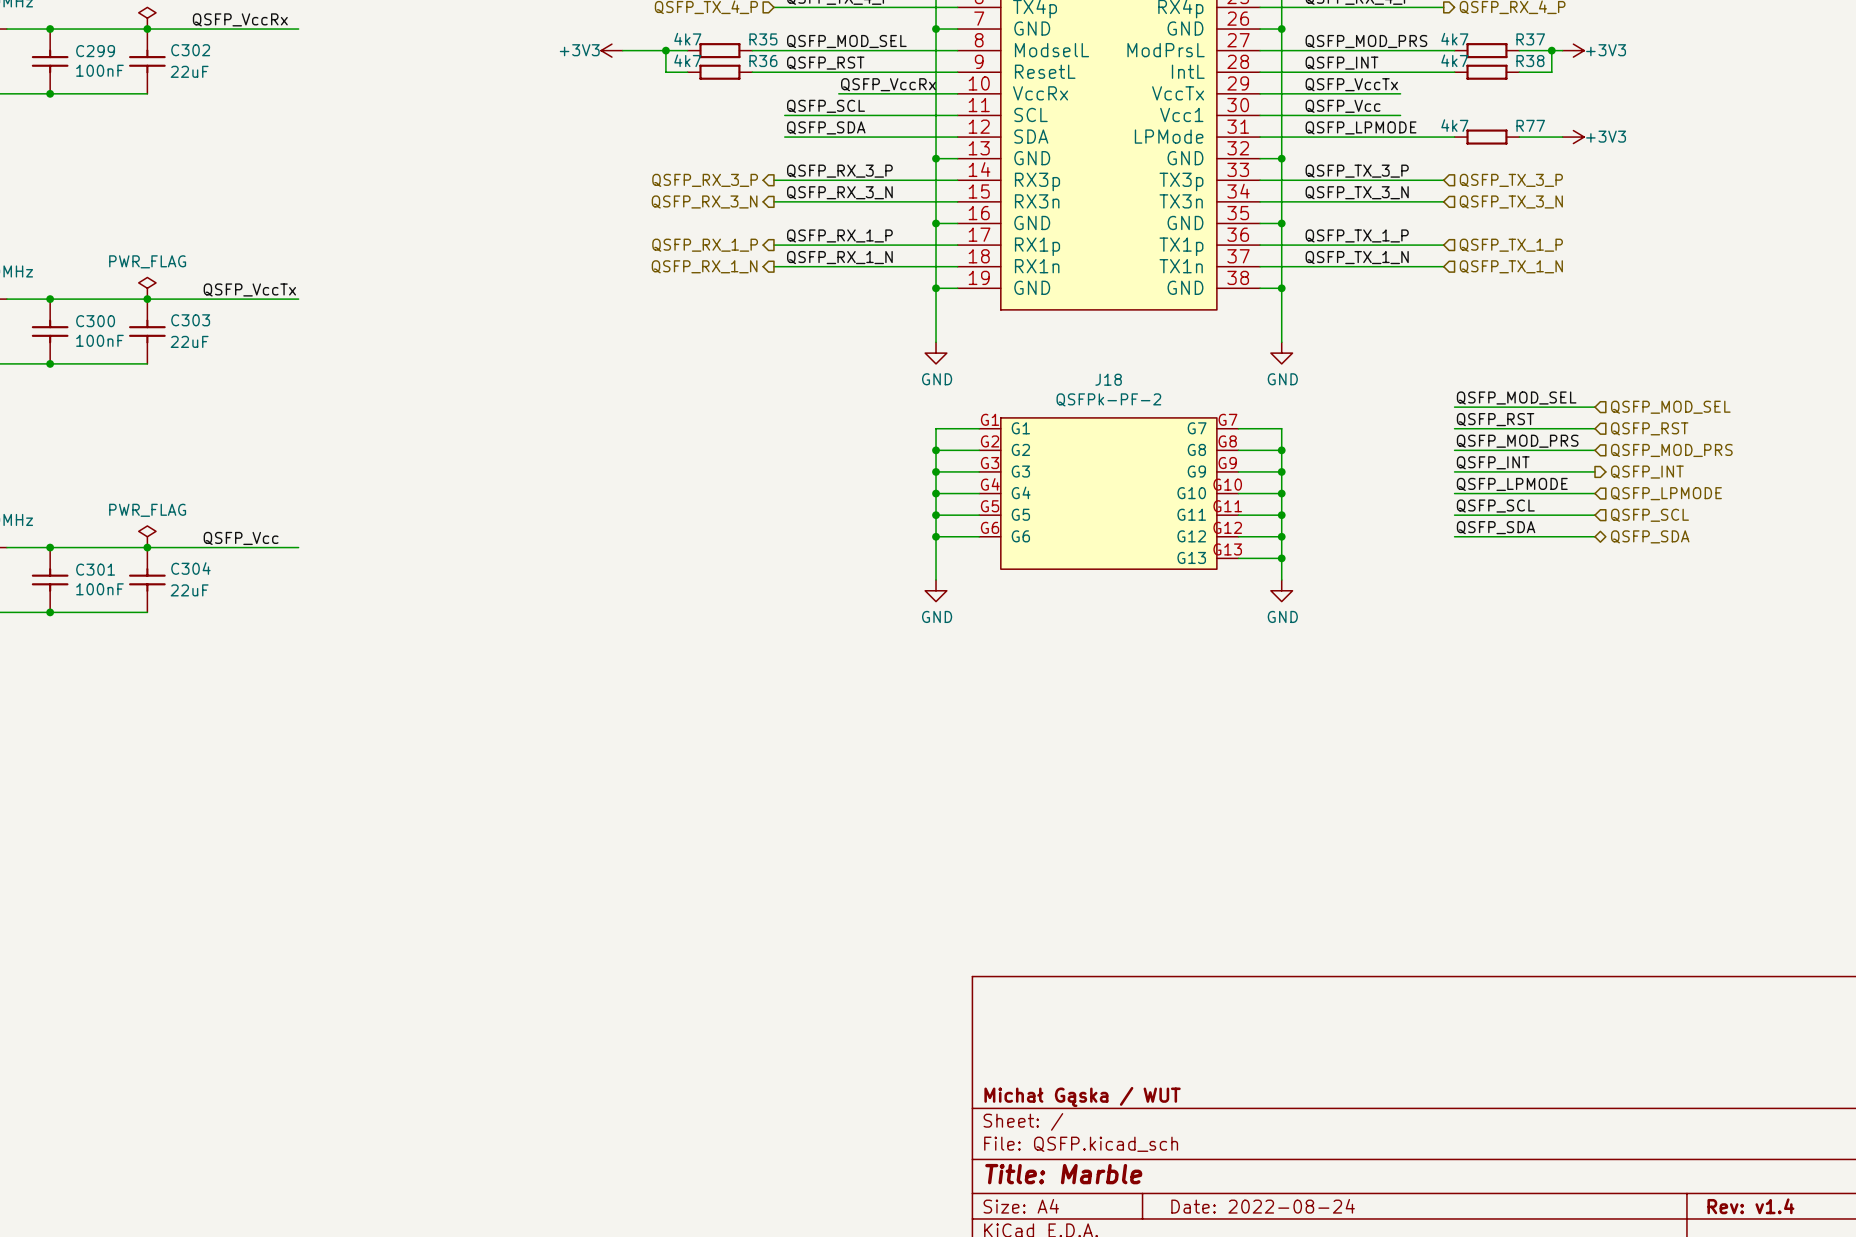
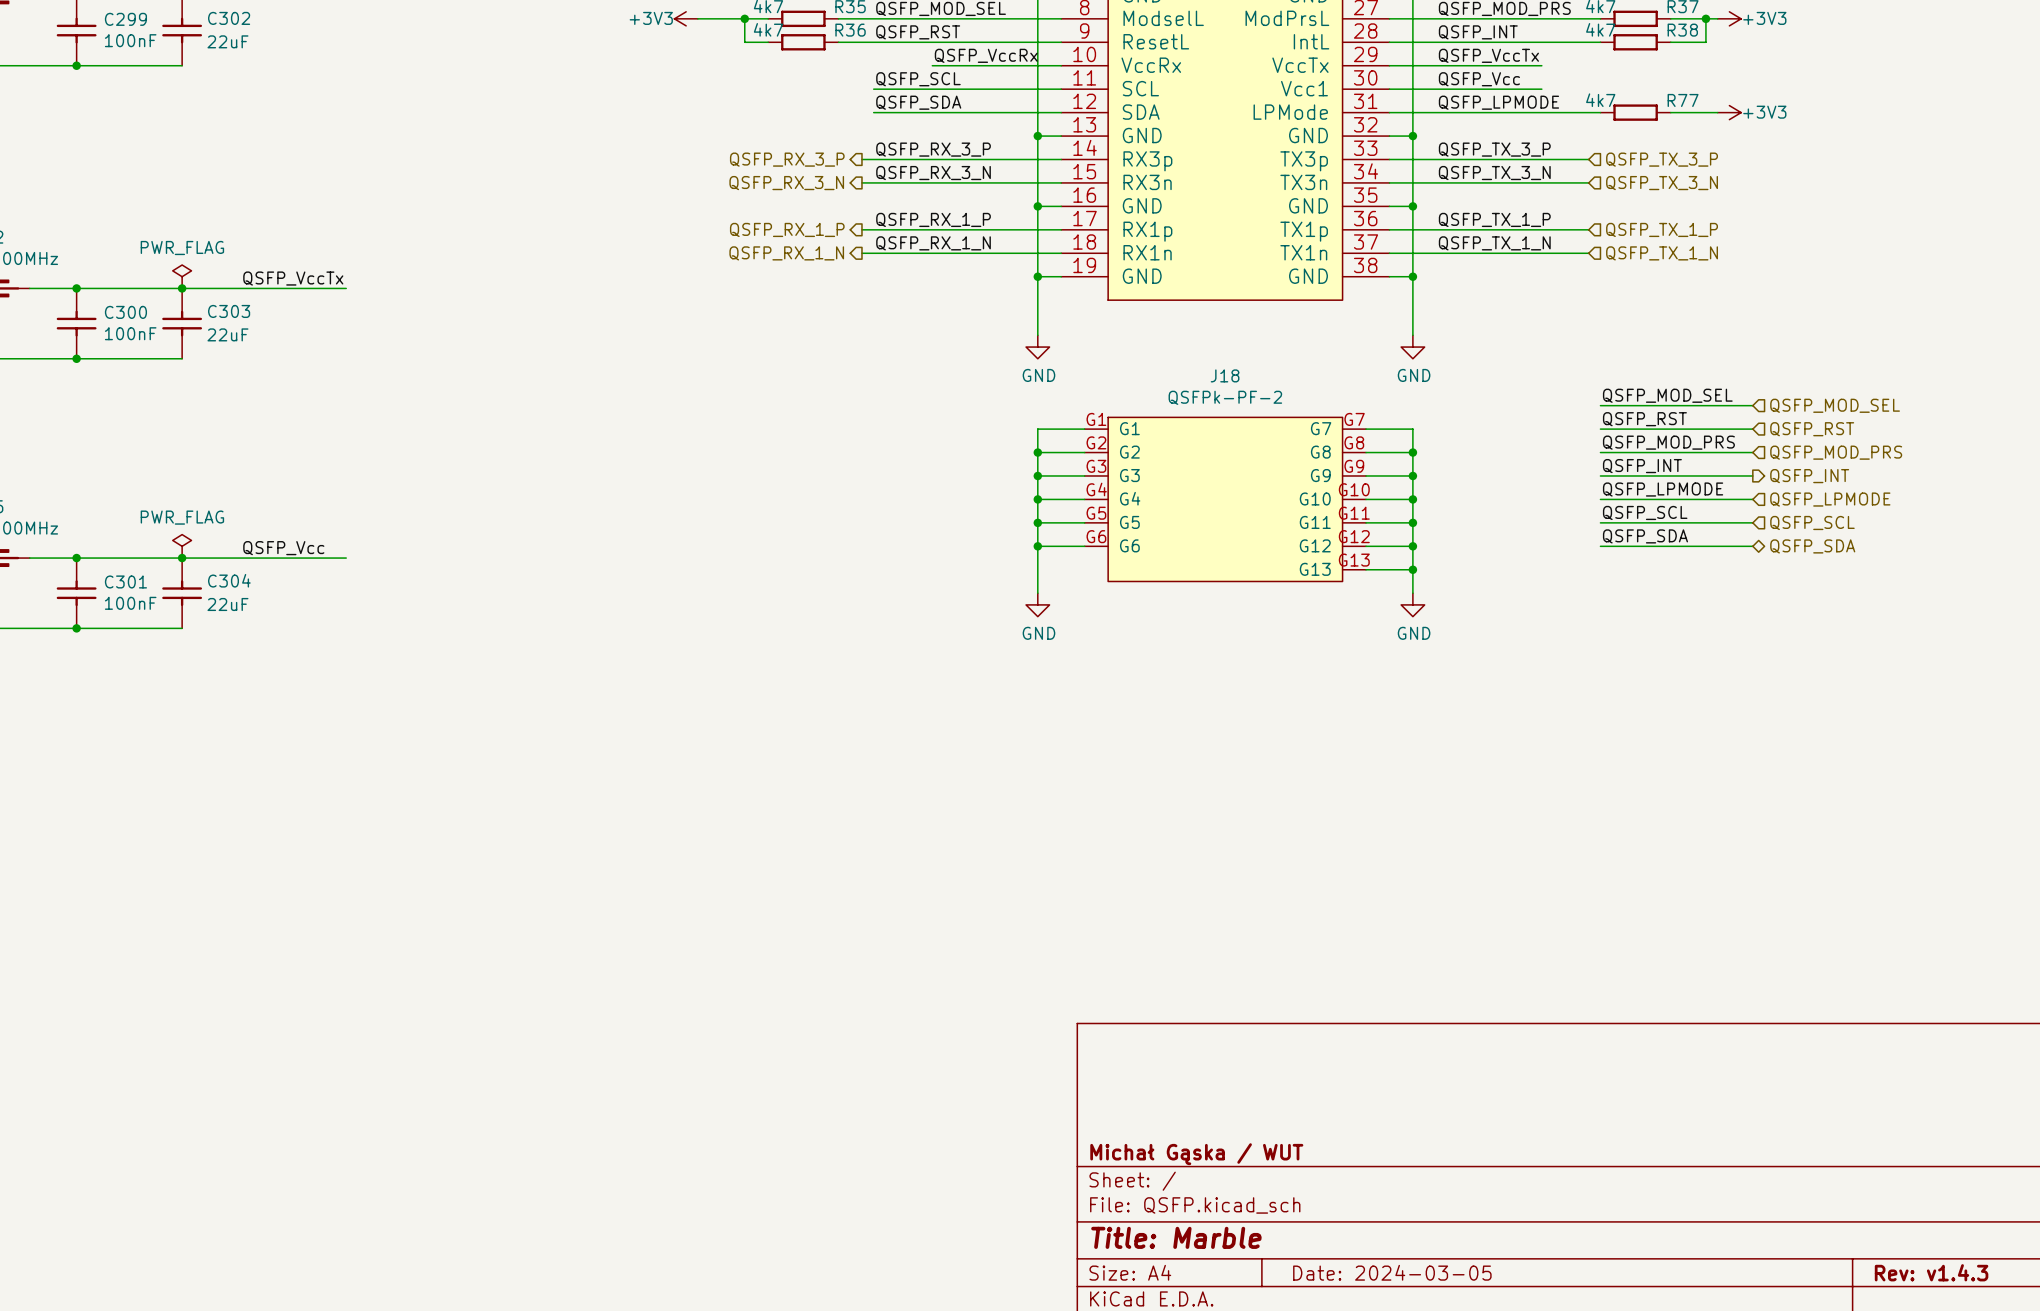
title block: Date: 2022-08-24 (1263, 1206) -> Date: 2024-03-05 (1392, 1272)
title block: Rev: v1.4 (1750, 1206) -> Rev: v1.4.3 (1931, 1272)

